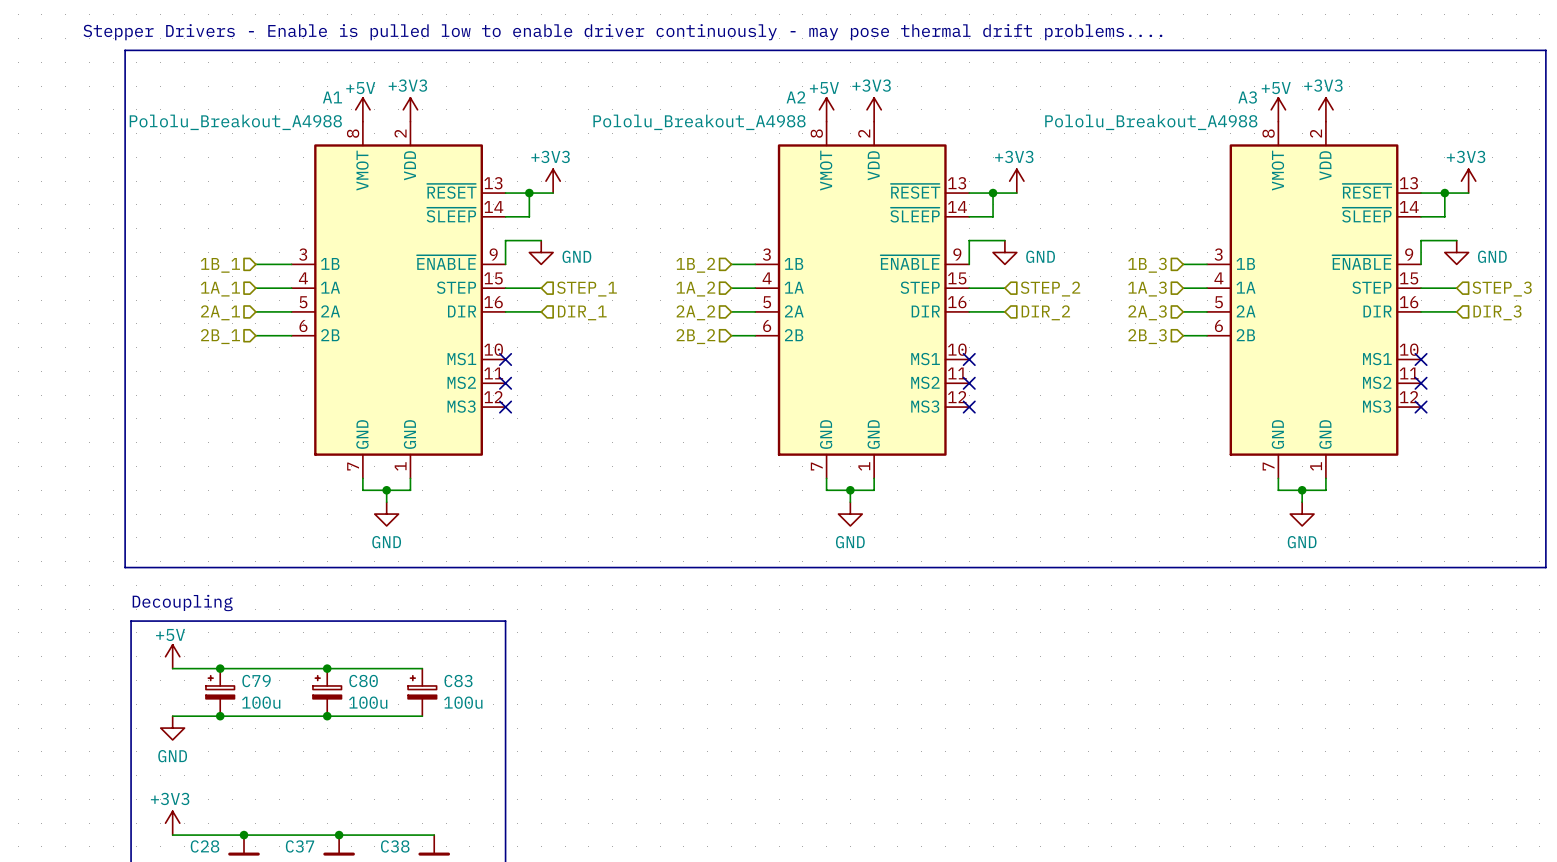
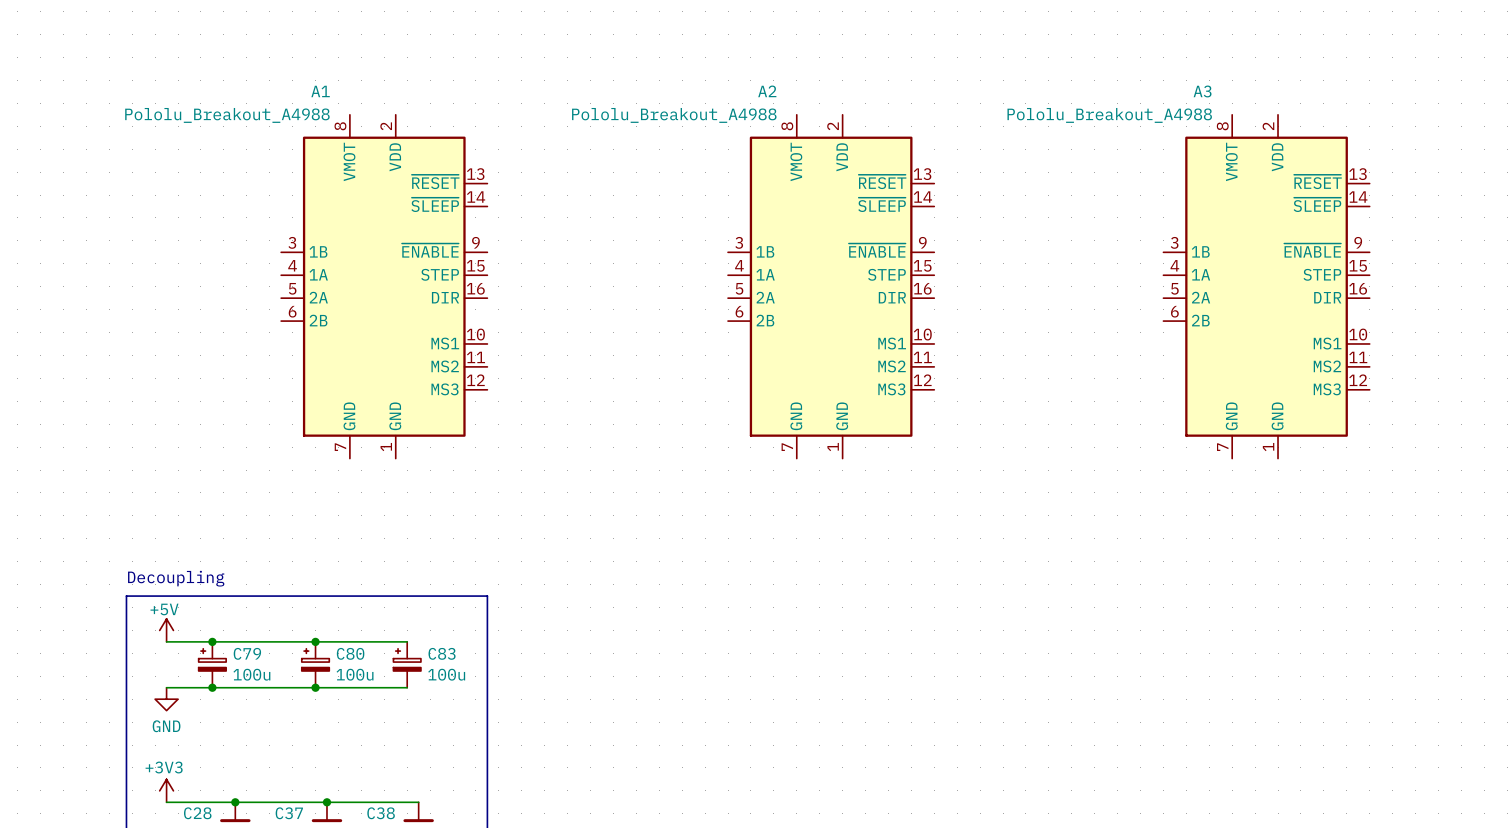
text: Stepper Drivers - Enable is pulled low to enable driver continuously - may pose thermal drift problems.... (622, 32) -> none
line: (125, 50) (1545, 50) (1545, 567) (125, 567) (125, 50) -> none
power symbol: +5V (362, 109) -> none
power symbol: +3V3 (410, 109) -> none
power symbol: +5V (826, 109) -> none
power symbol: +3V3 (874, 109) -> none
power symbol: +5V (1278, 109) -> none
power symbol: +3V3 (1325, 109) -> none
power symbol: +3V3 (553, 181) -> none
power symbol: +3V3 (1016, 181) -> none
power symbol: +3V3 (1468, 181) -> none
wire: (505, 193) (553, 193) -> none
wire: (529, 193) (529, 216) (505, 216) -> none
junction: (529, 193) -> none
wire: (969, 193) (1016, 193) -> none
wire: (993, 193) (993, 216) (969, 216) -> none
junction: (993, 193) -> none
wire: (1421, 193) (1468, 193) -> none
wire: (1444, 193) (1444, 216) (1421, 216) -> none
junction: (1444, 193) -> none
wire: (541, 240) (505, 240) (505, 264) -> none
wire: (1004, 240) (969, 240) (969, 264) -> none
wire: (1456, 240) (1421, 240) (1421, 264) -> none
power symbol: GND (541, 252) -> none
power symbol: GND (1004, 252) -> none
power symbol: GND (1456, 252) -> none
wire: (255, 264) (291, 264) -> none
wire: (731, 264) (755, 264) -> none
wire: (1183, 264) (1207, 264) -> none
hierarchical label: 1B_1 (220, 265) -> none
hierarchical label: 1B_2 (695, 265) -> none
hierarchical label: 1B_3 (1147, 265) -> none
wire: (255, 288) (291, 288) -> none
wire: (505, 288) (541, 288) -> none
wire: (731, 288) (755, 288) -> none
wire: (969, 288) (1004, 288) -> none
wire: (1183, 288) (1207, 288) -> none
wire: (1421, 288) (1456, 288) -> none
hierarchical label: 1A_1 (220, 289) -> none
hierarchical label: STEP_1 (586, 289) -> none
hierarchical label: 1A_2 (695, 289) -> none
hierarchical label: STEP_2 (1050, 289) -> none
hierarchical label: 1A_3 (1147, 289) -> none
hierarchical label: STEP_3 (1502, 289) -> none
wire: (255, 311) (291, 311) -> none
wire: (505, 311) (541, 311) -> none
wire: (731, 311) (755, 311) -> none
wire: (969, 311) (1004, 311) -> none
wire: (1183, 311) (1207, 311) -> none
wire: (1421, 311) (1456, 311) -> none
hierarchical label: 2A_1 (220, 312) -> none
hierarchical label: DIR_1 (582, 312) -> none
hierarchical label: 2A_2 (695, 312) -> none
hierarchical label: DIR_2 (1045, 312) -> none
hierarchical label: 2A_3 (1147, 312) -> none
hierarchical label: DIR_3 (1497, 312) -> none
wire: (255, 335) (291, 335) -> none
wire: (731, 335) (755, 335) -> none
wire: (1183, 335) (1207, 335) -> none
hierarchical label: 2B_1 (220, 336) -> none
hierarchical label: 2B_2 (695, 336) -> none
hierarchical label: 2B_3 (1147, 336) -> none
no-connect mark: (505, 359) -> none
no-connect mark: (969, 359) -> none
no-connect mark: (1421, 359) -> none
no-connect mark: (505, 383) -> none
no-connect mark: (969, 383) -> none
no-connect mark: (1421, 383) -> none
no-connect mark: (505, 407) -> none
no-connect mark: (969, 407) -> none
no-connect mark: (1421, 407) -> none
wire: (362, 478) (362, 490) (410, 490) (410, 478) -> none
wire: (826, 478) (826, 490) (874, 490) (874, 478) -> none
wire: (1278, 478) (1278, 490) (1325, 490) (1325, 478) -> none
wire: (386, 490) (386, 502) -> none
junction: (386, 490) -> none
wire: (850, 490) (850, 502) -> none
junction: (850, 490) -> none
wire: (1302, 490) (1302, 502) -> none
junction: (1302, 490) -> none
power symbol: GND (386, 514) -> none
power symbol: GND (850, 514) -> none
power symbol: GND (1302, 514) -> none

